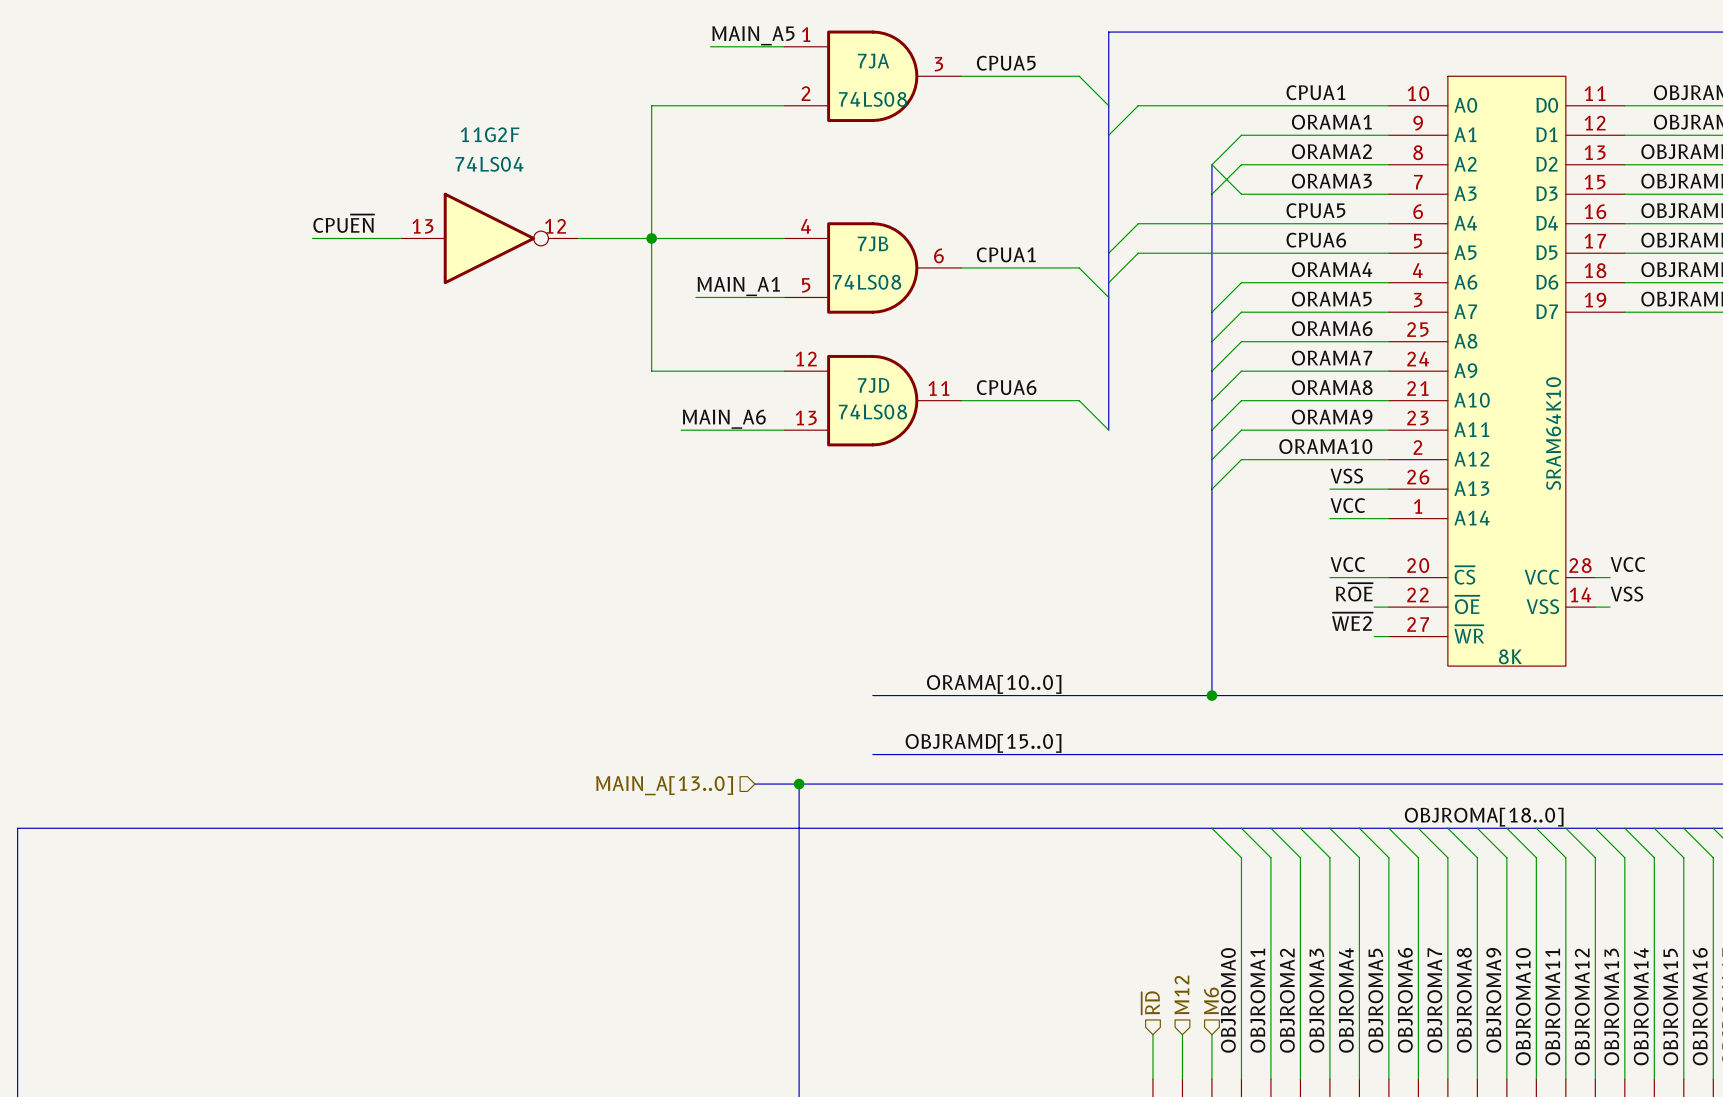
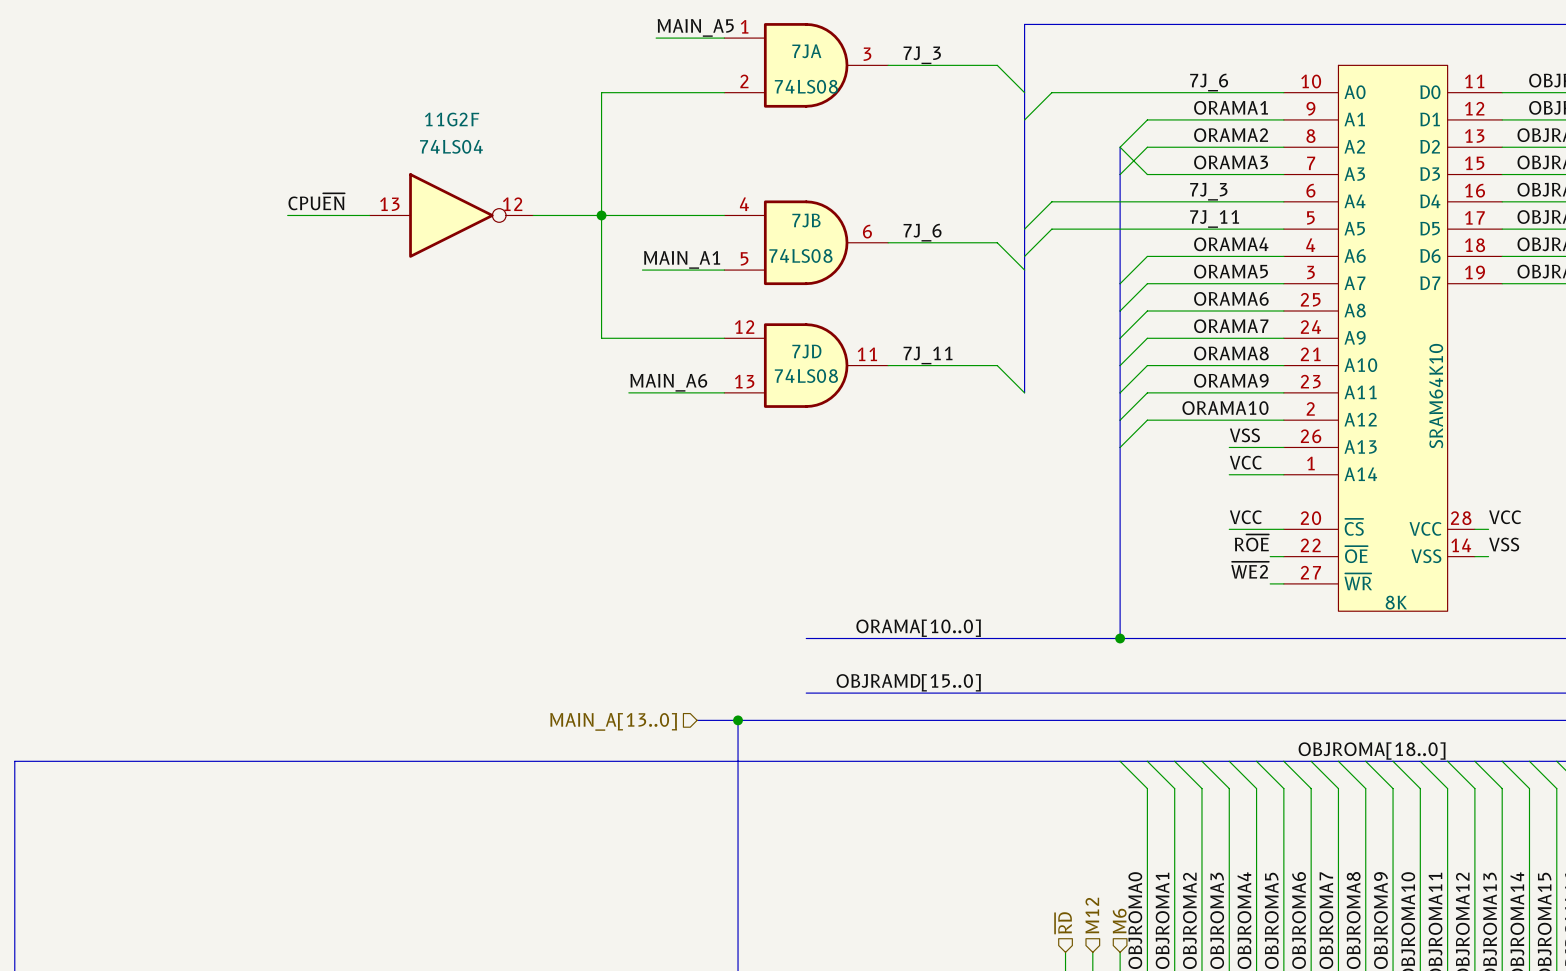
label: CPUA5 (1006, 63) -> 7J_3 (922, 55)
label: CPUA1 (1315, 92) -> 7J_6 (1209, 82)
label: CPUA5 (1315, 210) -> 7J_3 (1208, 191)
label: CPUA6 (1316, 240) -> 7J_11 (1214, 218)
label: CPUA1 (1006, 254) -> 7J_6 (922, 232)
label: CPUA6 (1006, 387) -> 7J_11 (928, 355)

